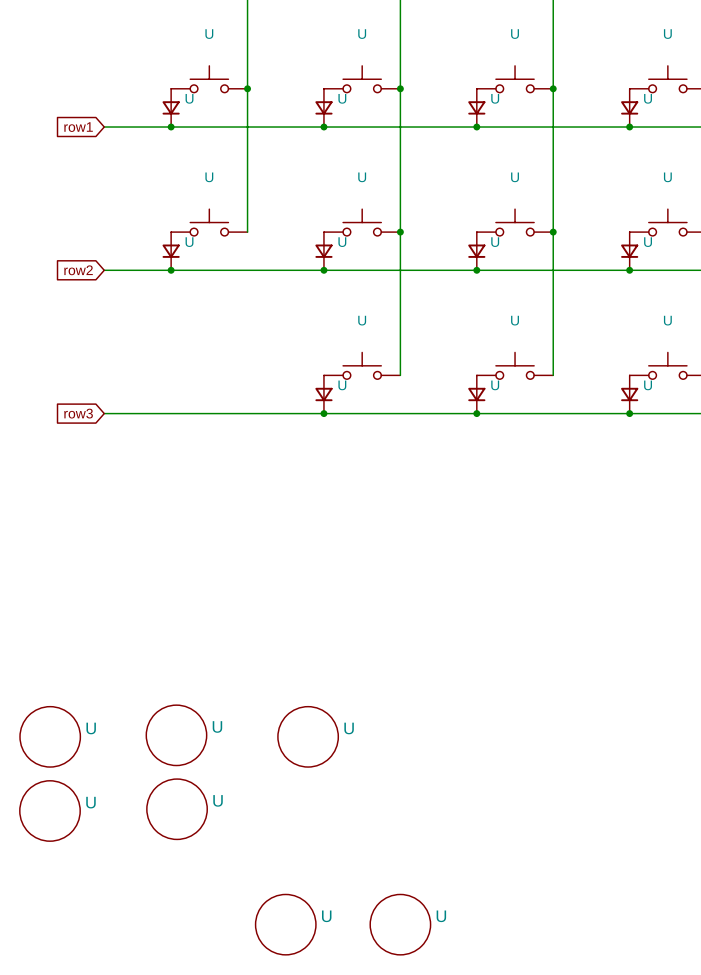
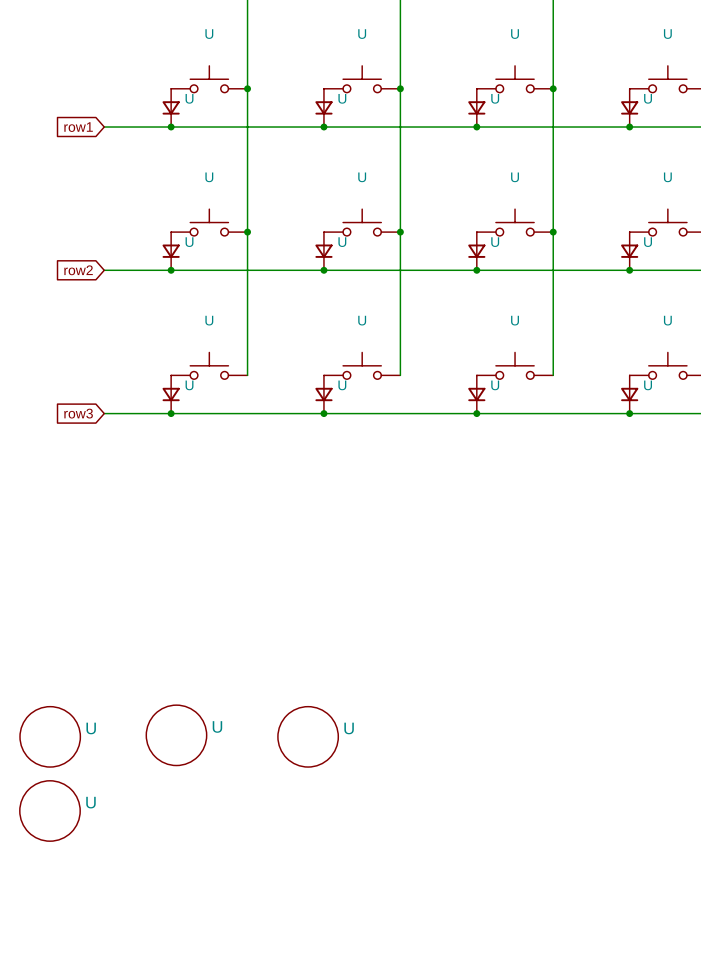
wire: none -> (247, 232) (247, 375)
junction: none -> (247, 232)
U: none -> (209, 365)
U: none -> (171, 394)
junction: none -> (171, 413)
U: (177, 809) -> none
U: (285, 924) -> none
U: (400, 924) -> none

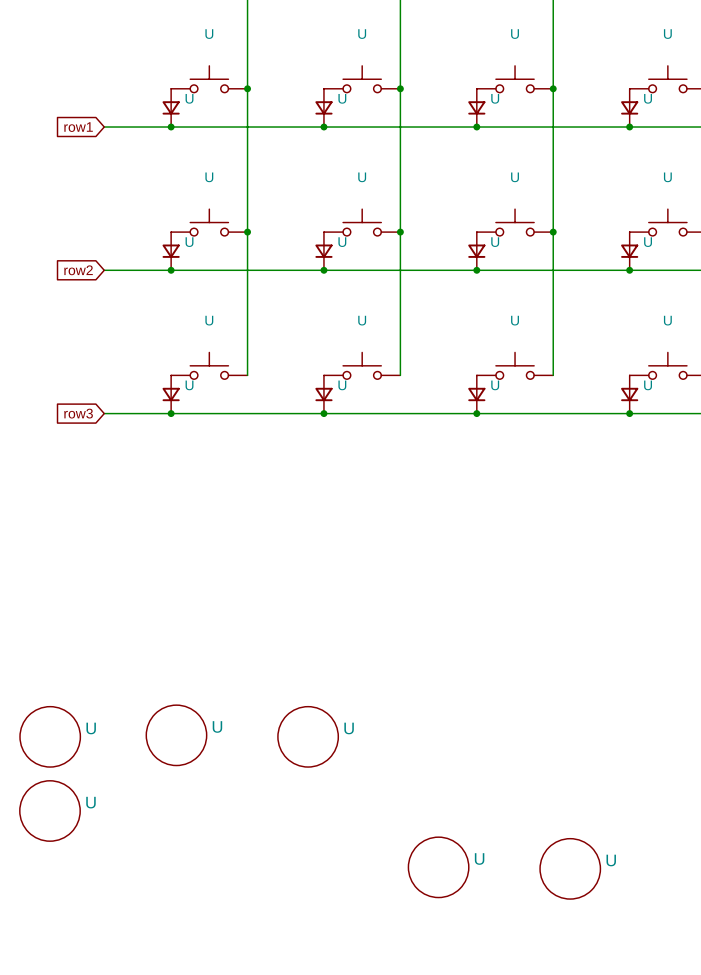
U: none -> (438, 867)
U: none -> (570, 868)

